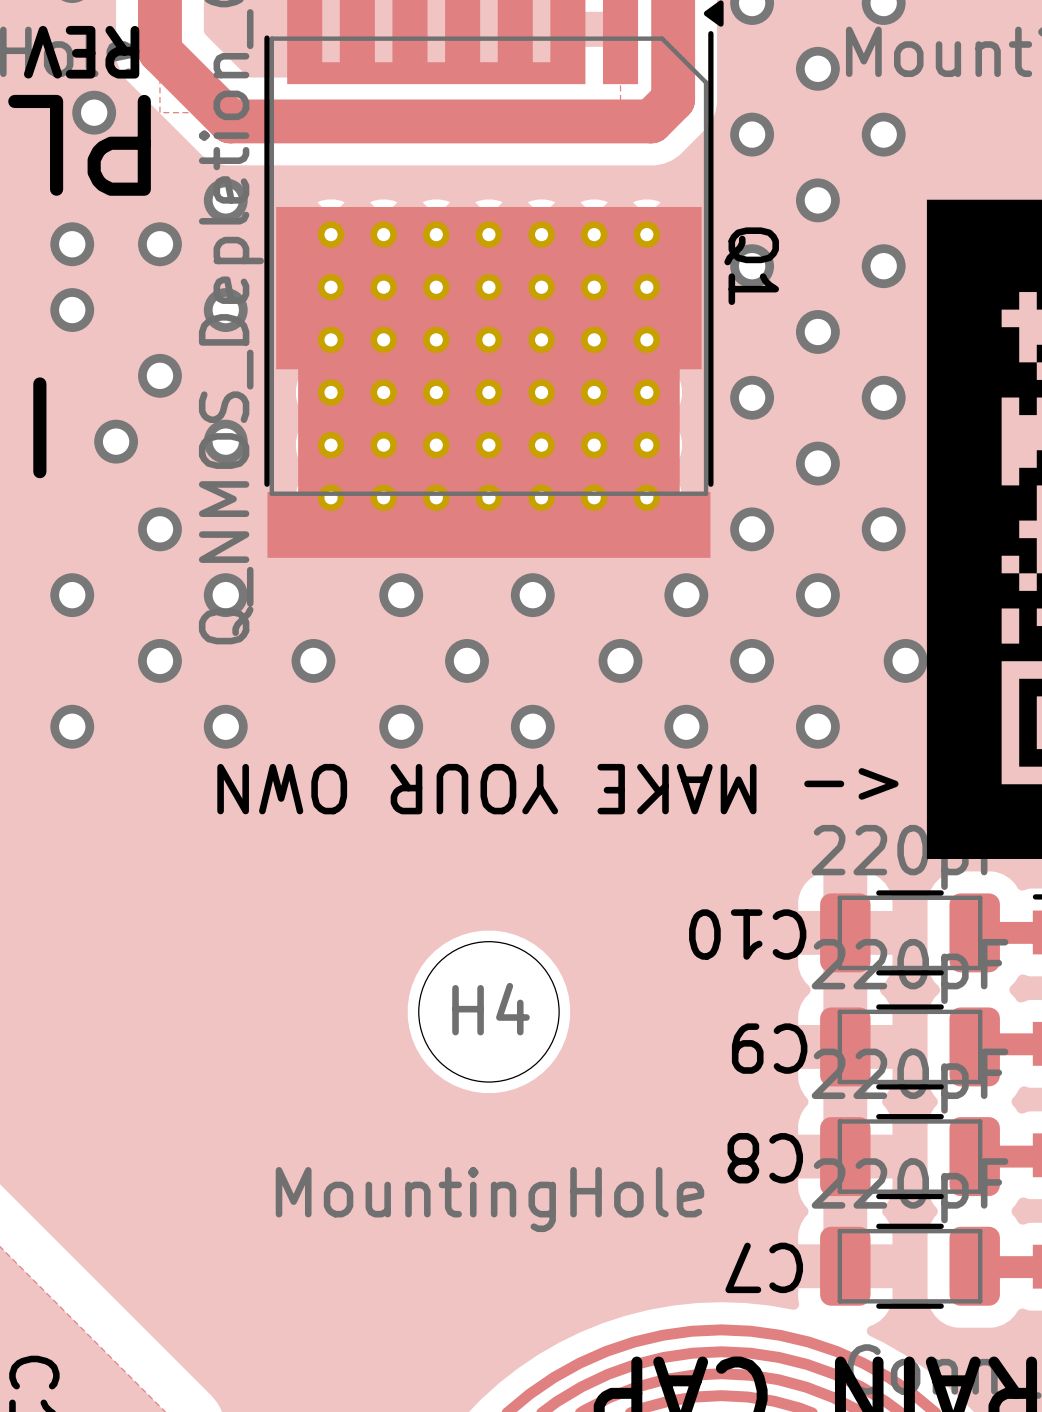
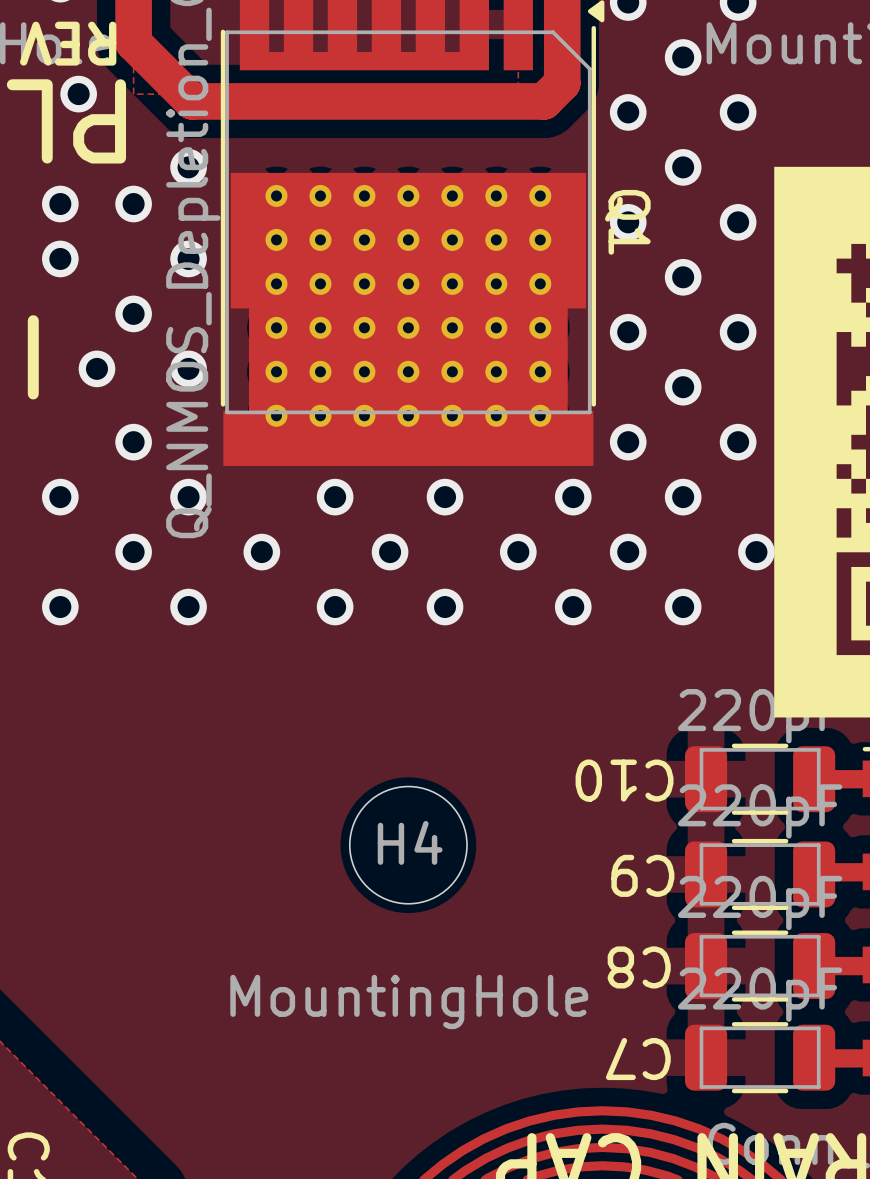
text: <- MAKE YOUR OWN (557, 789) -> none

